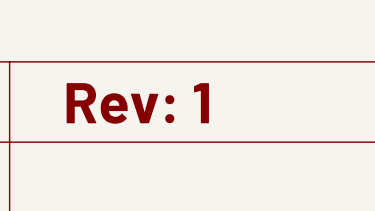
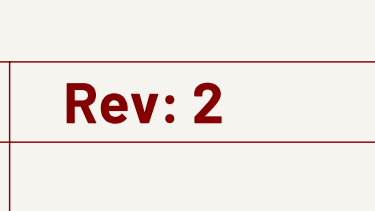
title block: Rev: 1 (137, 103) -> Rev: 2 (144, 103)

